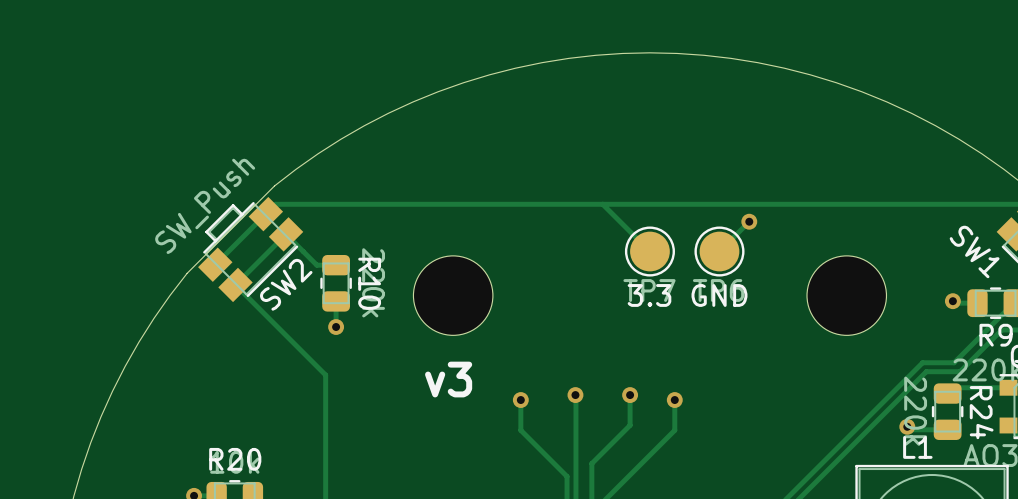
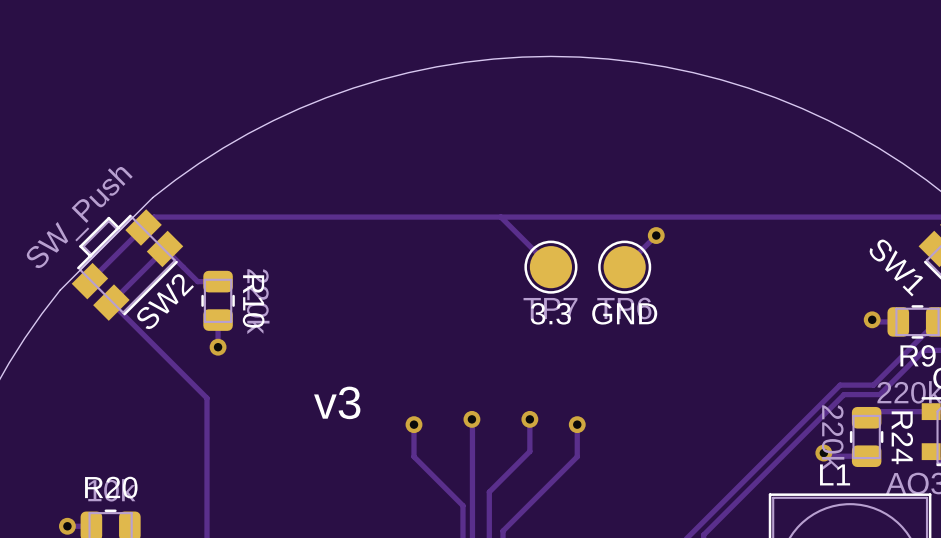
part: (453, 295) -> none
part: (846, 295) -> none

